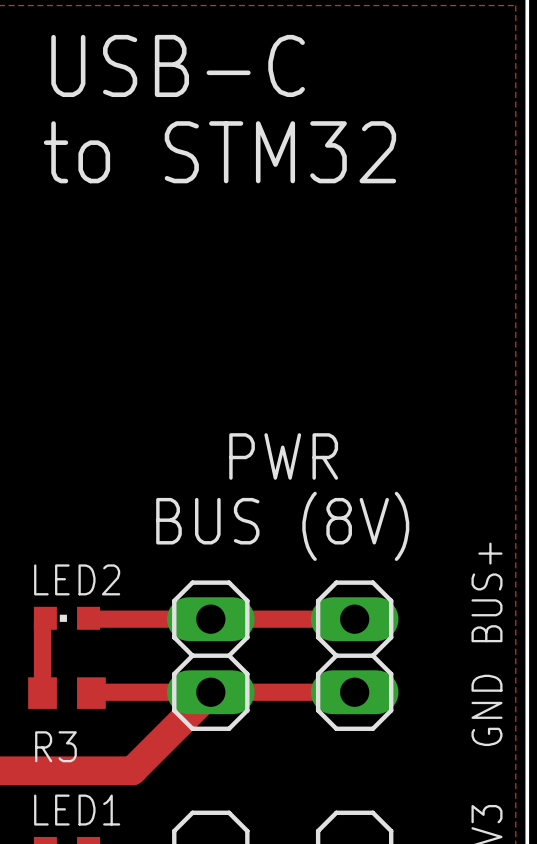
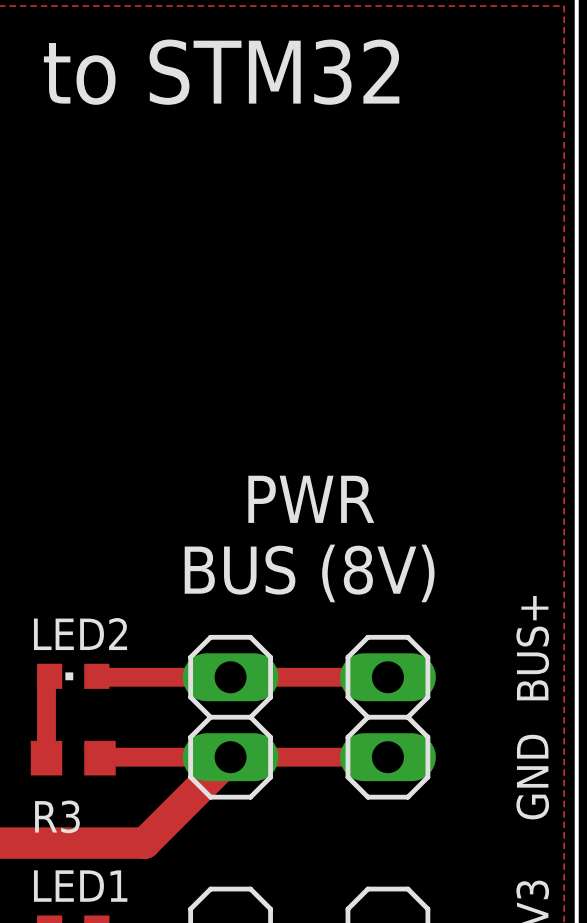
text: USB-C (178, 65) -> to STM32 (221, 72)
text: to STM32 (220, 152) -> none

